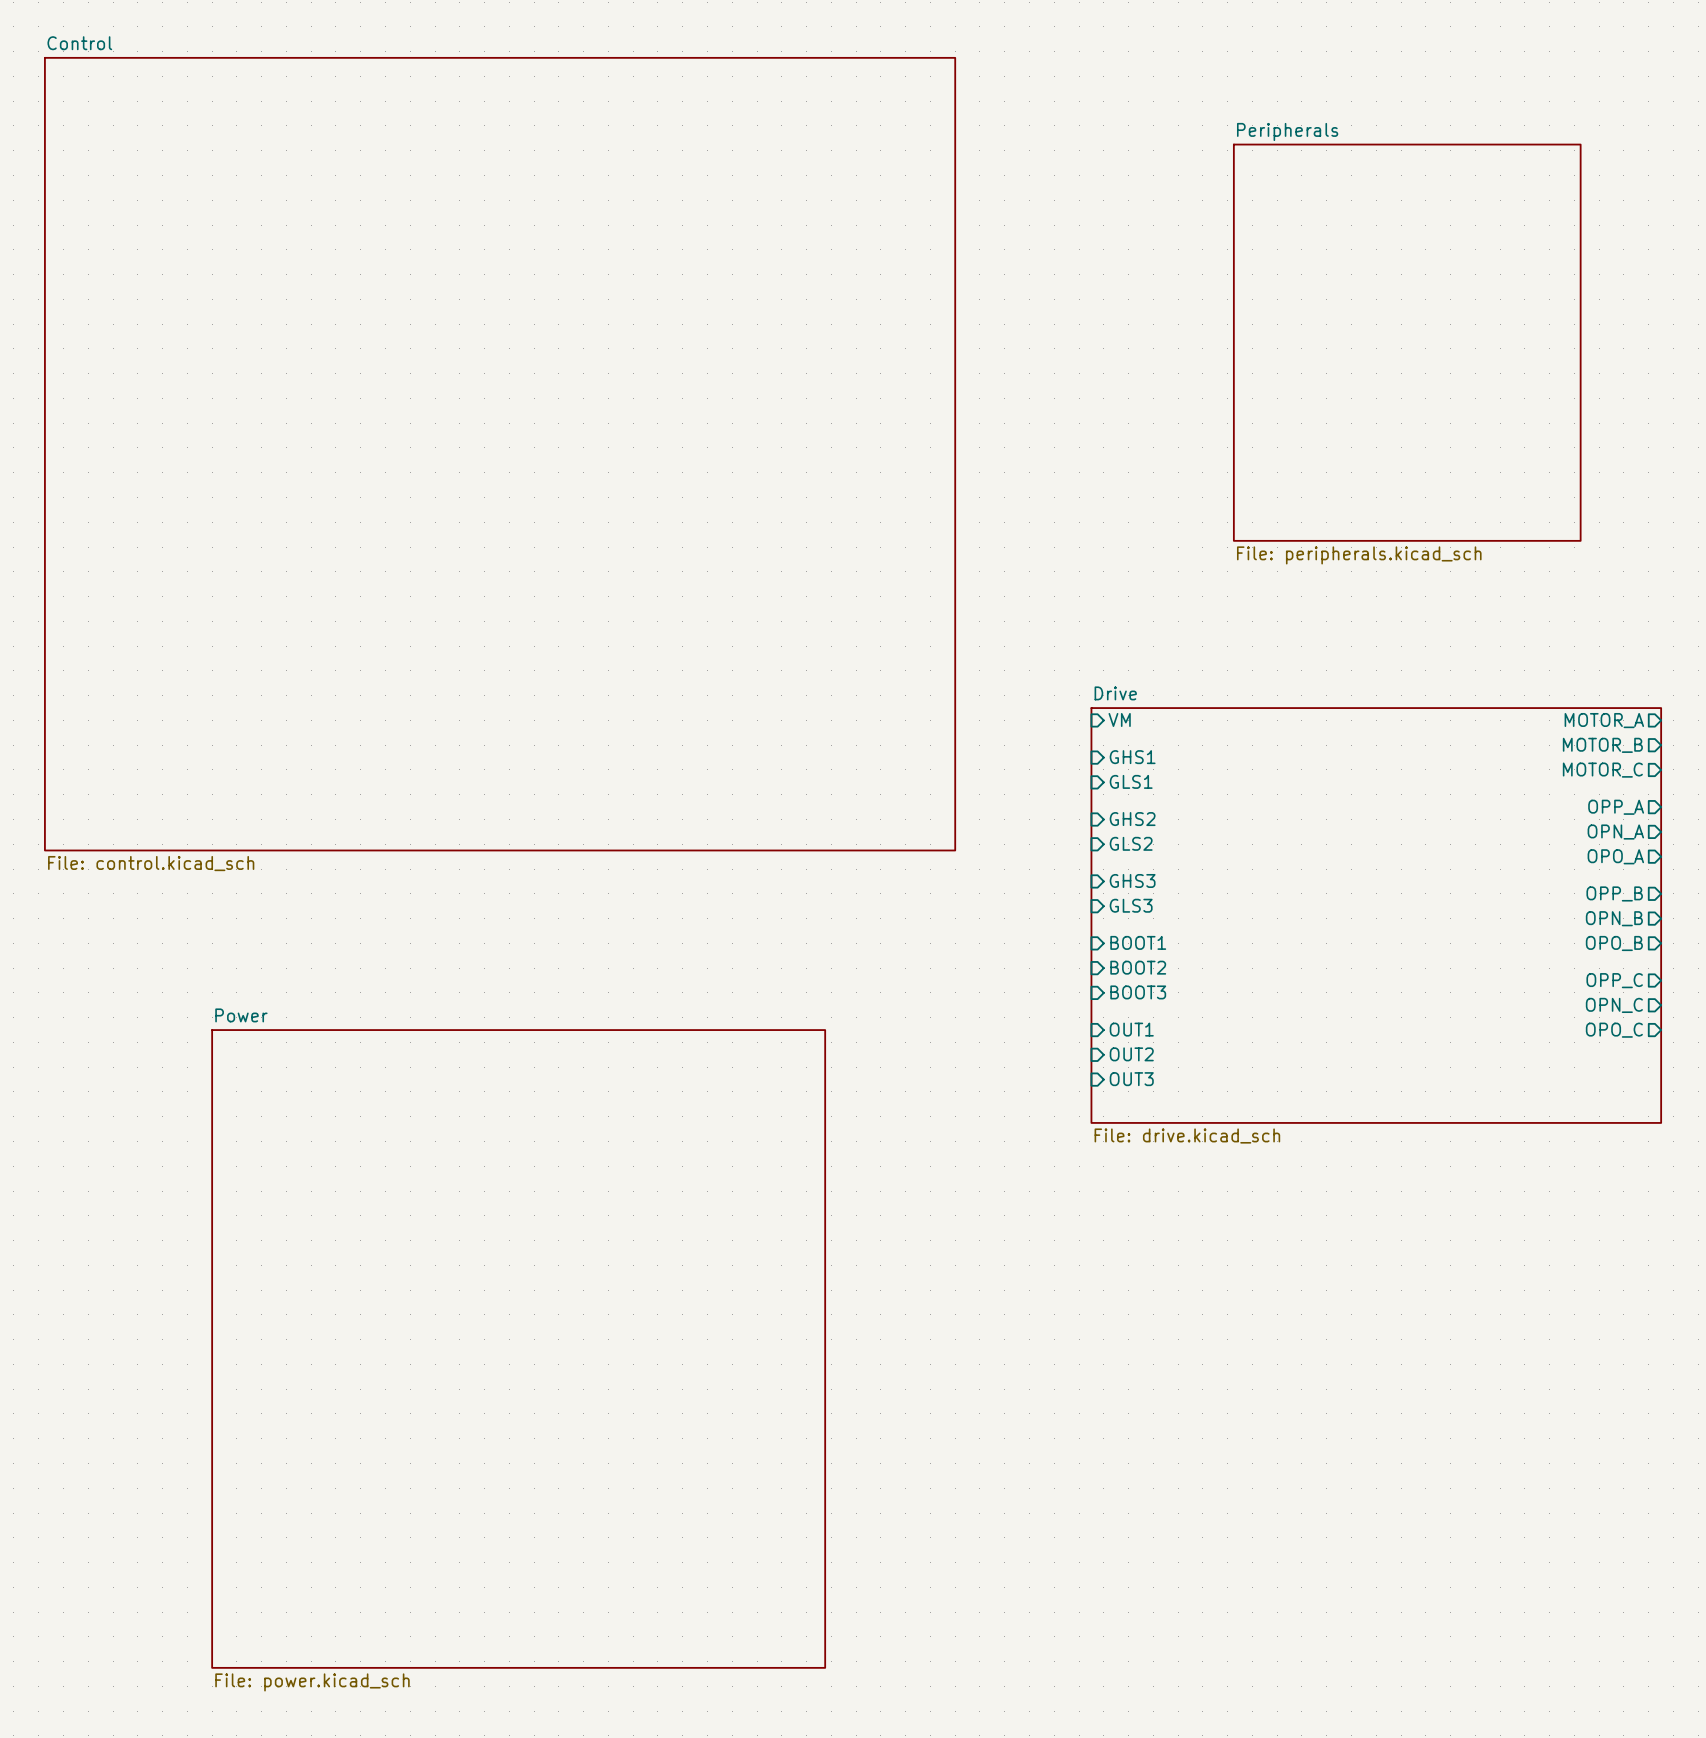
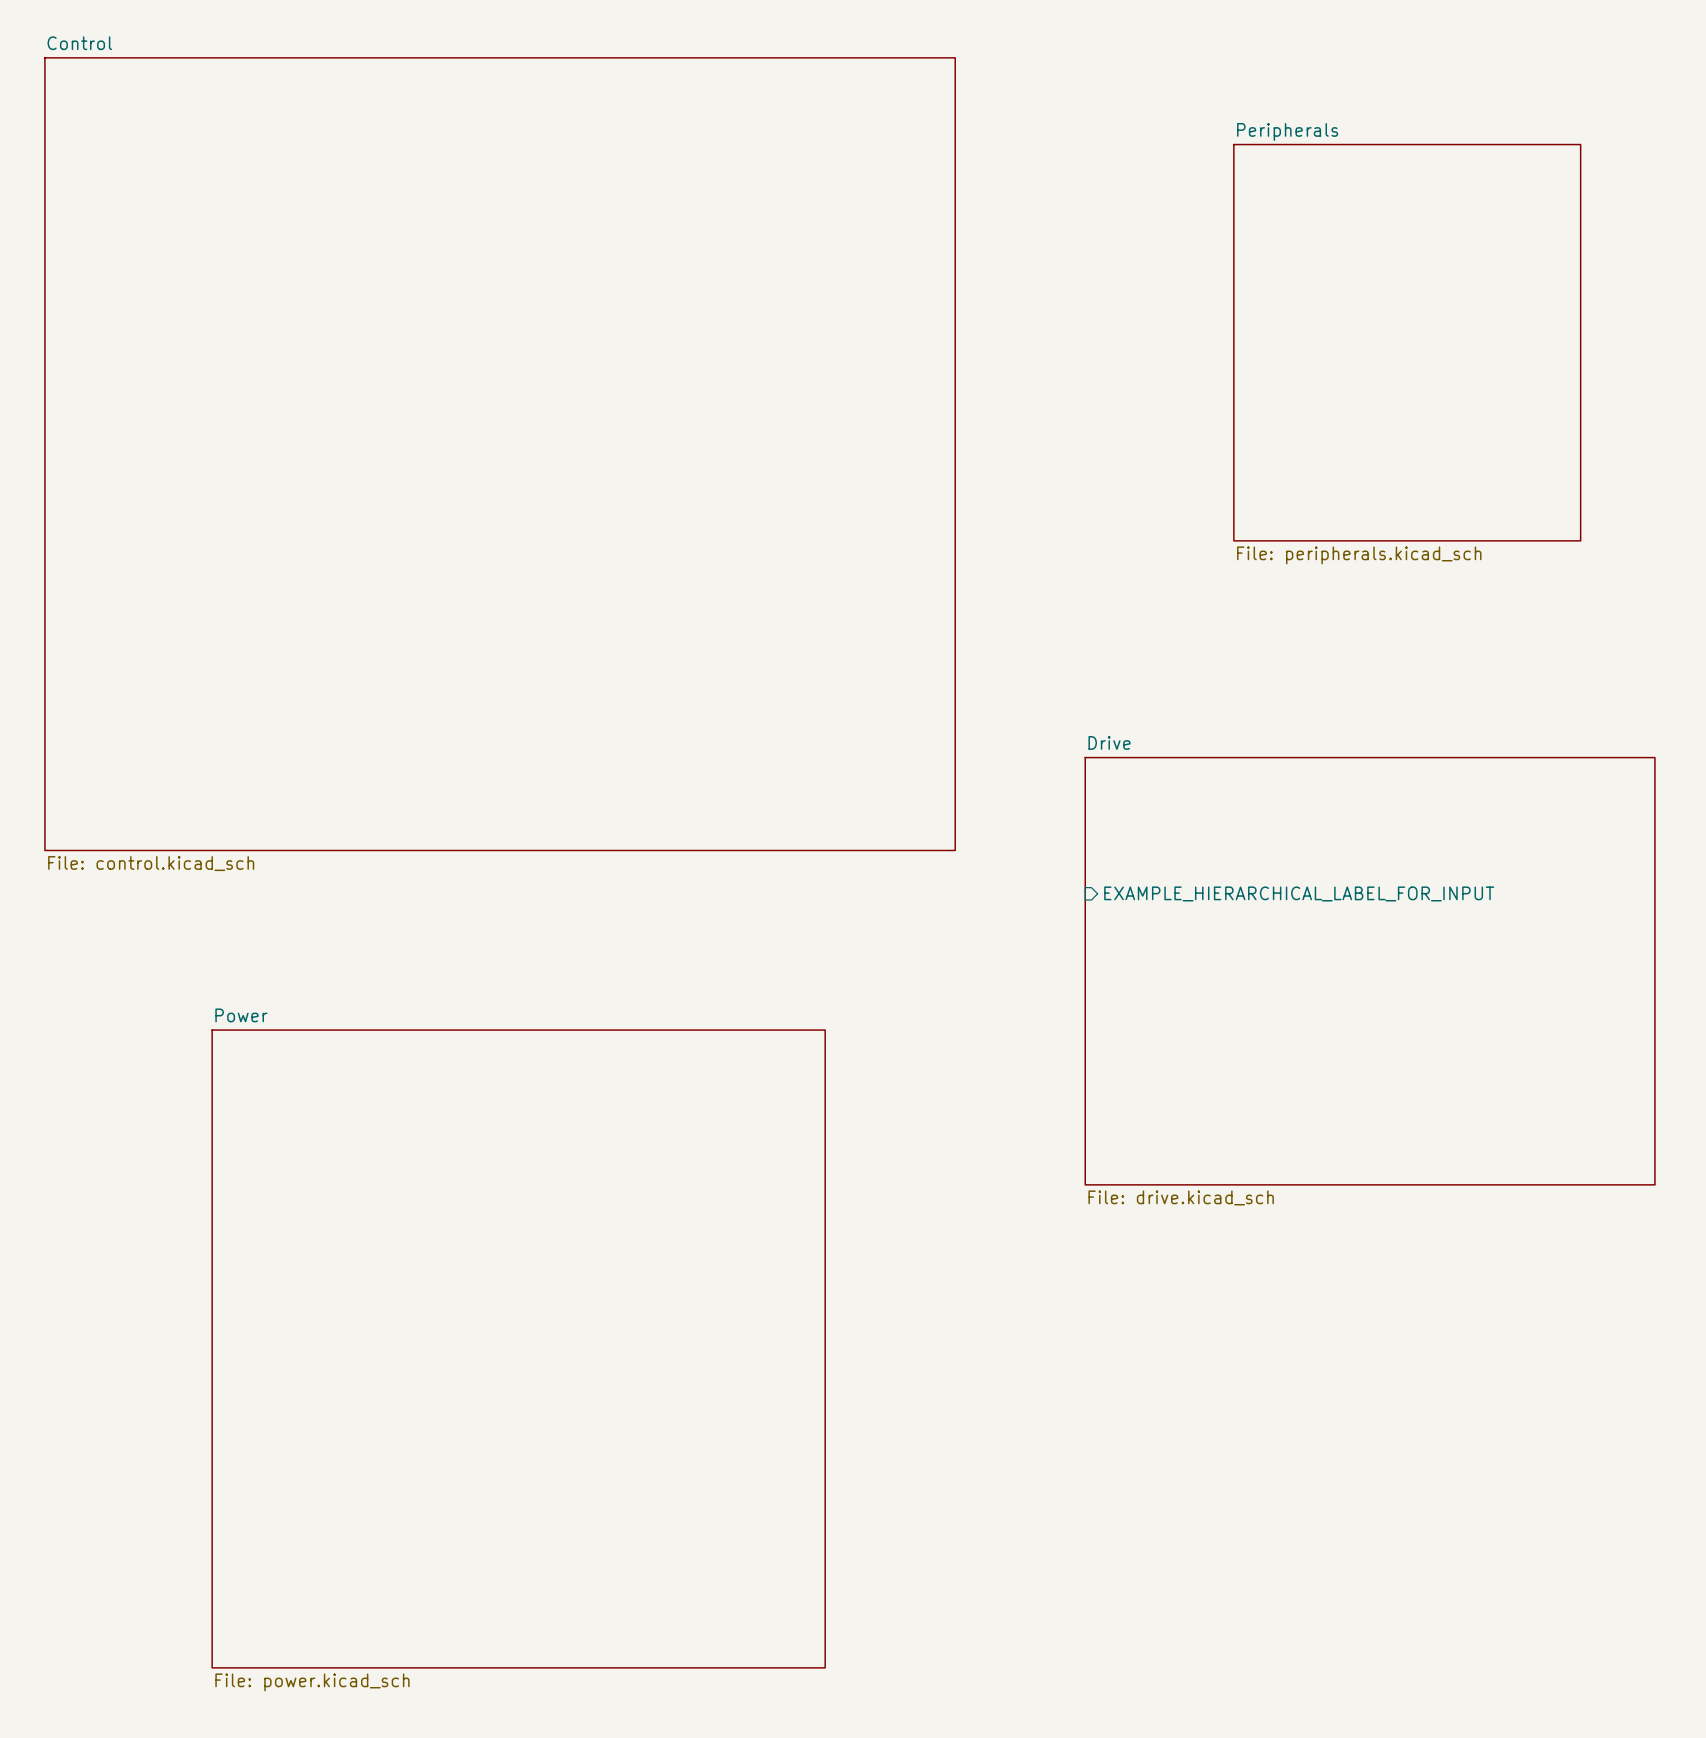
sheet pin: VM (1119, 719) -> none
sheet pin: MOTOR_A (1604, 720) -> none
sheet pin: MOTOR_B (1602, 745) -> none
sheet pin: GHS1 (1132, 757) -> none
sheet pin: MOTOR_C (1602, 770) -> none
sheet pin: GLS1 (1131, 781) -> none
sheet pin: OPP_A (1616, 807) -> none
sheet pin: GHS2 (1132, 819) -> none
sheet pin: OPN_A (1615, 832) -> none
sheet pin: GLS2 (1131, 843) -> none
sheet pin: OPO_A (1615, 856) -> none
sheet pin: GHS3 (1132, 880) -> none
sheet pin: none -> EXAMPLE_HIERARCHICAL_LABEL_FOR_INPUT (1299, 893)
sheet pin: OPP_B (1614, 893) -> none
sheet pin: GLS3 (1131, 905) -> none
sheet Drive: File: drive.kicad_sch (1376, 915) -> none
sheet pin: OPN_B (1614, 918) -> none
sheet pin: BOOT1 (1138, 942) -> none
sheet pin: OPO_B (1614, 943) -> none
sheet pin: BOOT2 (1138, 967) -> none
sheet Drive: none -> File: drive.kicad_sch (1370, 971)
sheet pin: OPP_C (1614, 980) -> none
sheet pin: BOOT3 (1138, 992) -> none
sheet pin: OPN_C (1614, 1005) -> none
sheet pin: OUT1 (1131, 1029) -> none
sheet pin: OPO_C (1614, 1030) -> none
sheet pin: OUT2 (1131, 1054) -> none
sheet pin: OUT3 (1131, 1079) -> none

